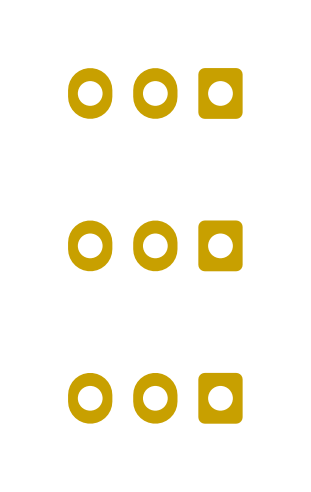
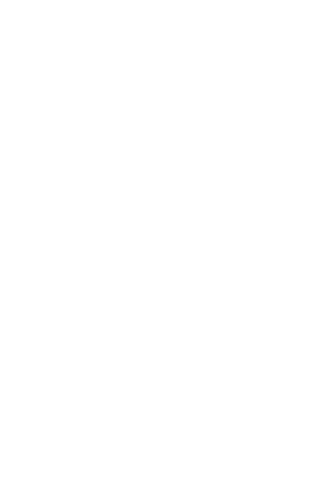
part: (155, 93) -> none
part: (155, 245) -> none
part: (155, 398) -> none

